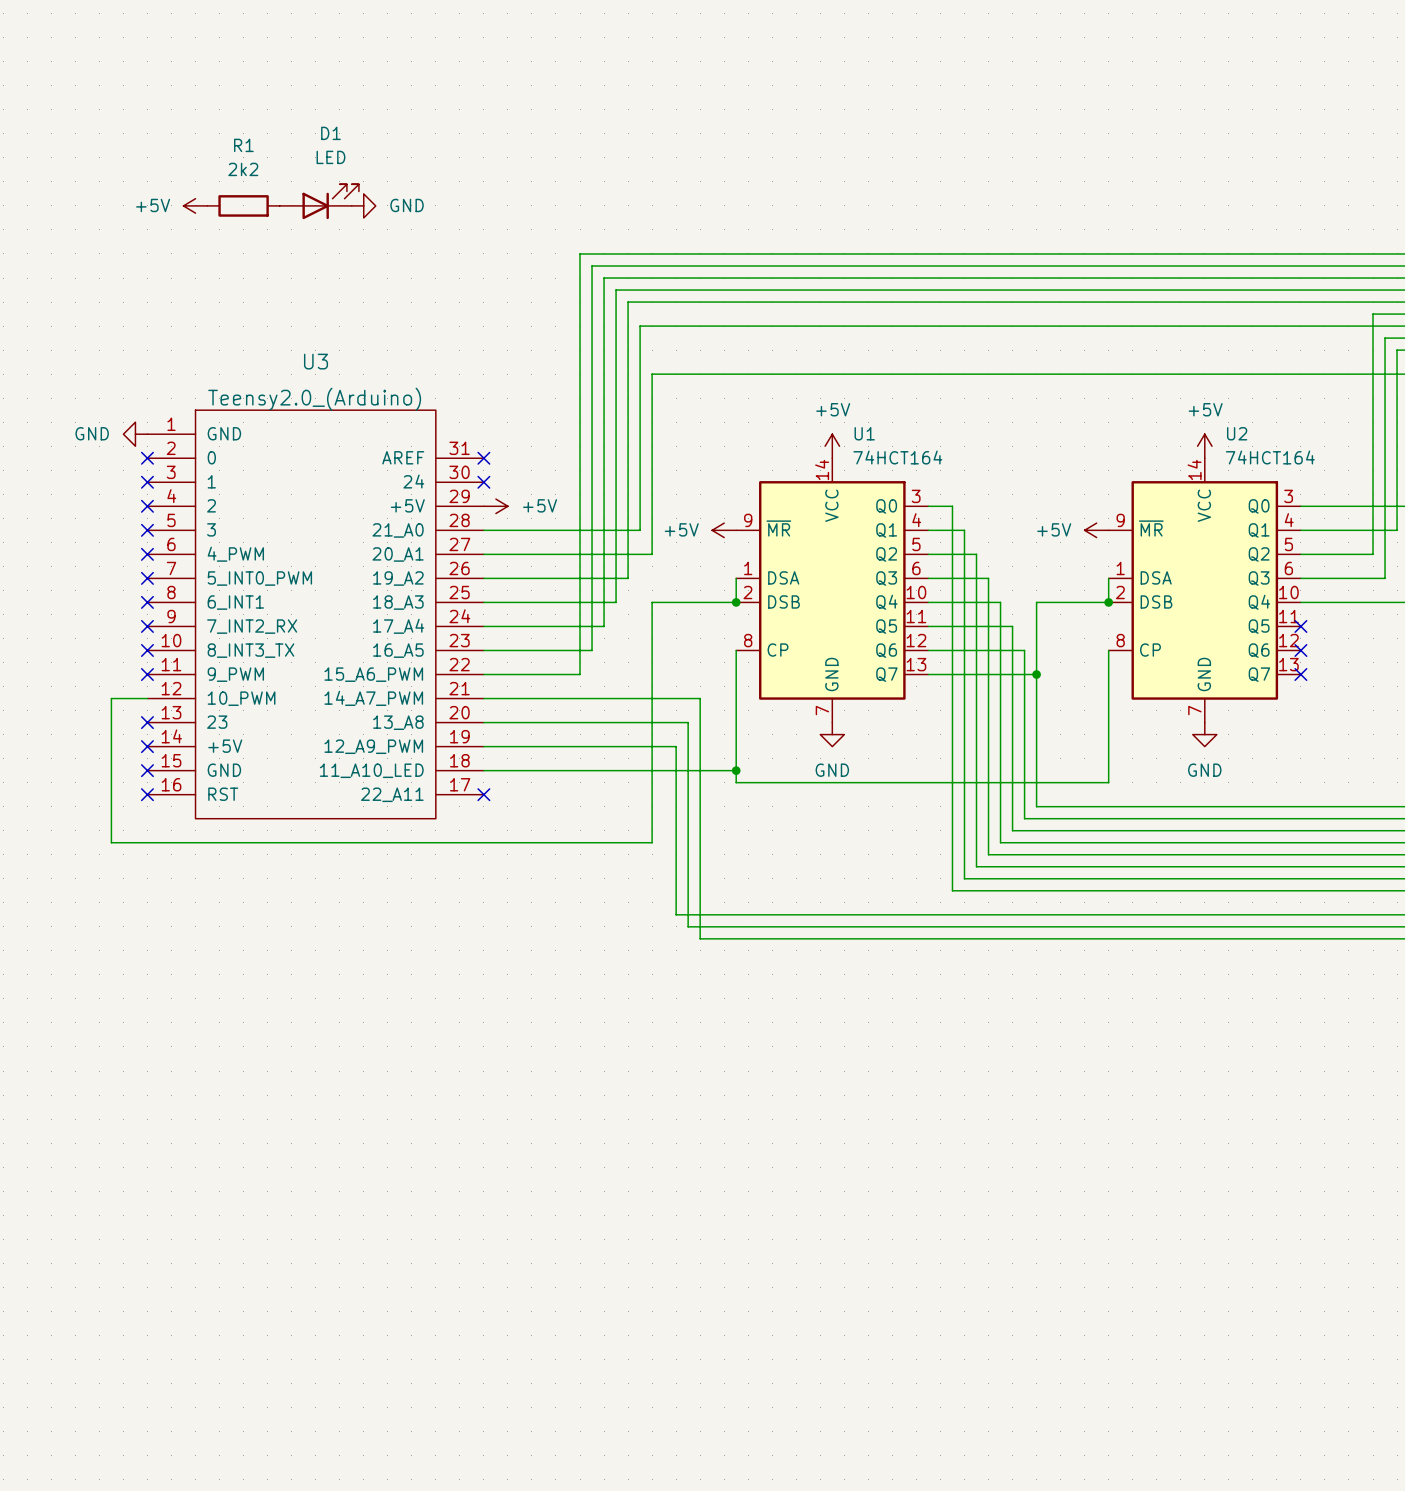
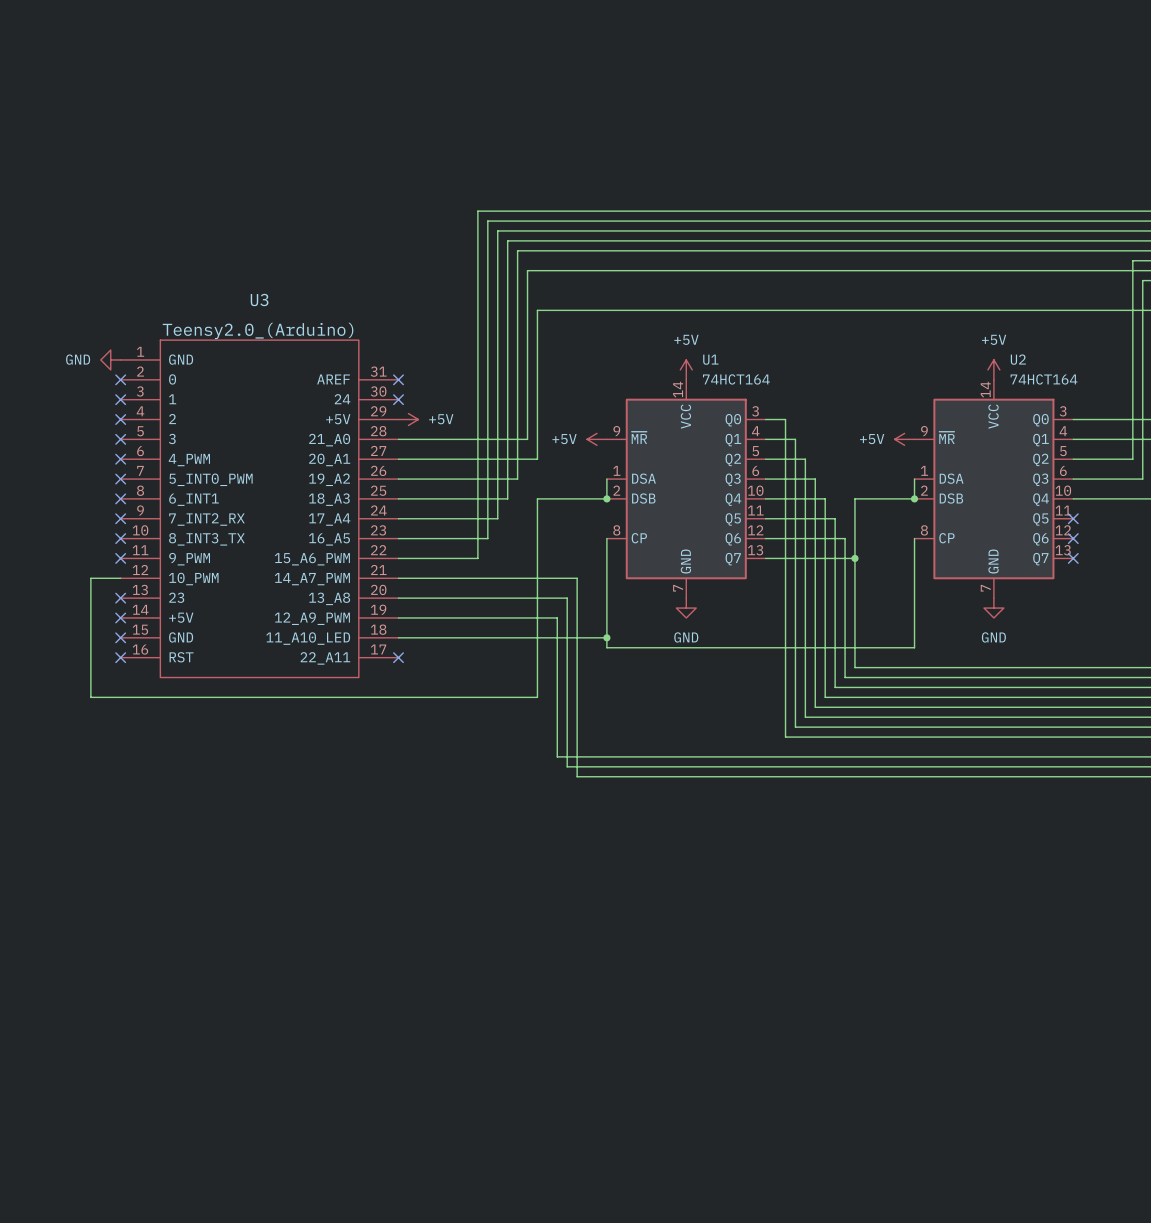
D1: LED (319, 201) -> none
power symbol: +5V (195, 205) -> none
R1: 2k2 (243, 205) -> none
power symbol: GND (363, 205) -> none

